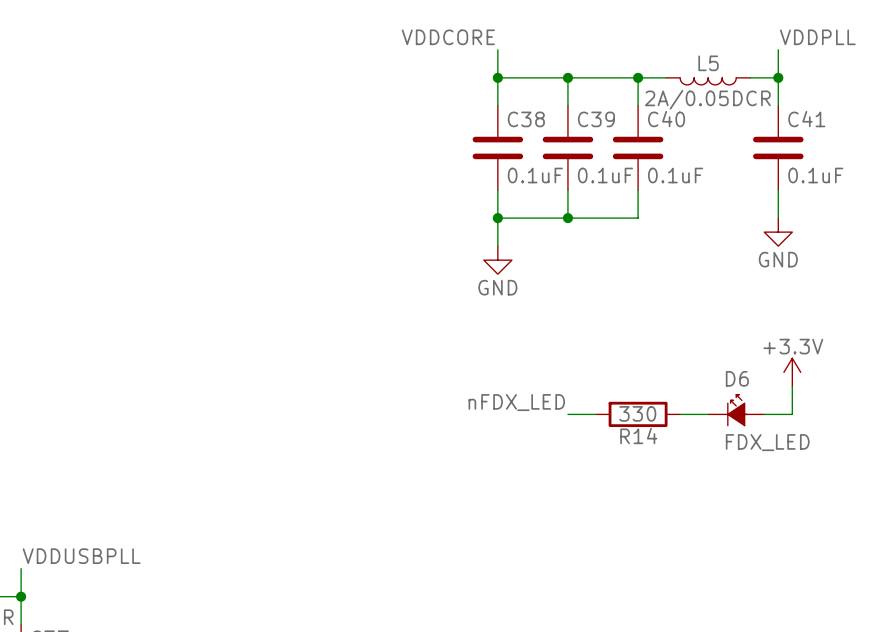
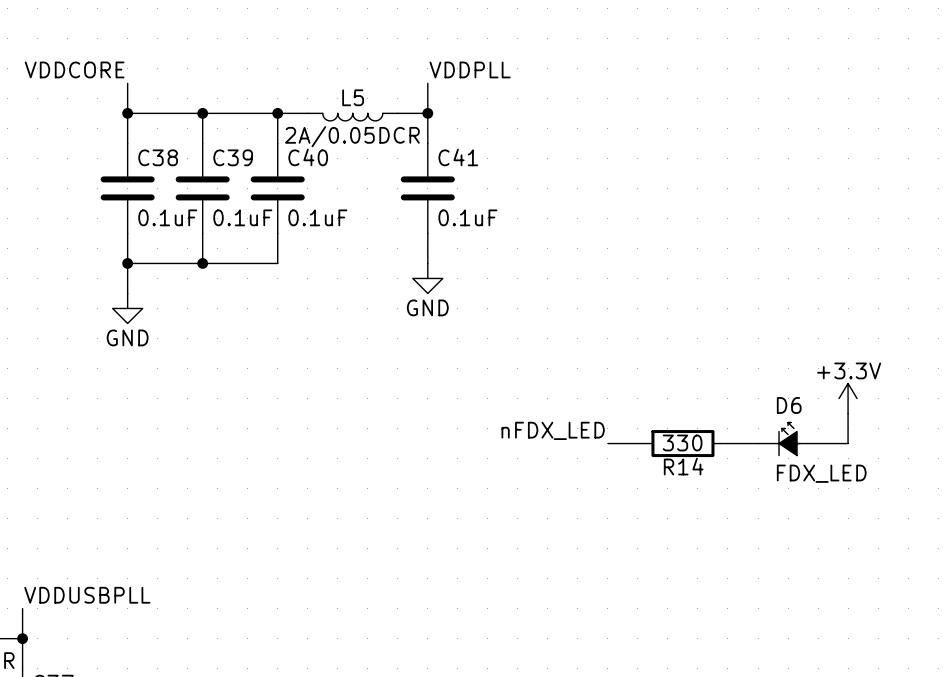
label: VDDCORE (448, 37) -> none
label: VDDPLL (817, 37) -> none
wire: (497, 49) (497, 105) -> (427, 83) (427, 143)
wire: (778, 49) (778, 105) -> none
label: none -> VDDCORE (74, 69)
label: none -> VDDPLL (470, 69)
wire: none -> (127, 83) (127, 143)
wire: (497, 77) (666, 77) -> none
junction: (497, 77) -> none
wire: (567, 77) (567, 105) -> none
junction: (567, 77) -> none
wire: (638, 77) (638, 105) -> none
junction: (638, 77) -> none
wire: (750, 77) (778, 77) -> none
junction: (778, 77) -> none
L5 position: (708, 81) -> (352, 117)
wire: none -> (127, 113) (307, 113)
junction: none -> (127, 113)
wire: none -> (202, 113) (202, 143)
junction: none -> (202, 113)
wire: none -> (277, 113) (277, 143)
junction: none -> (277, 113)
wire: none -> (397, 113) (427, 113)
junction: none -> (427, 113)
C38 position: (497, 147) -> (127, 188)
C39 position: (567, 147) -> (202, 188)
C40 position: (638, 147) -> (277, 188)
C41 position: (778, 147) -> (427, 188)
wire: (497, 190) (497, 246) -> none
wire: (567, 190) (567, 218) -> (427, 233) (427, 263)
wire: (638, 190) (638, 218) (497, 218) -> none
wire: (778, 190) (778, 218) -> none
wire: none -> (127, 233) (127, 293)
wire: none -> (202, 233) (202, 263)
wire: none -> (277, 233) (277, 263) (127, 263)
junction: (497, 218) -> none
junction: (567, 218) -> none
power symbol: GND (778, 232) -> none
junction: none -> (127, 263)
junction: none -> (202, 263)
power symbol position: GND (497, 260) -> GND (427, 278)
power symbol: none -> GND (127, 308)

